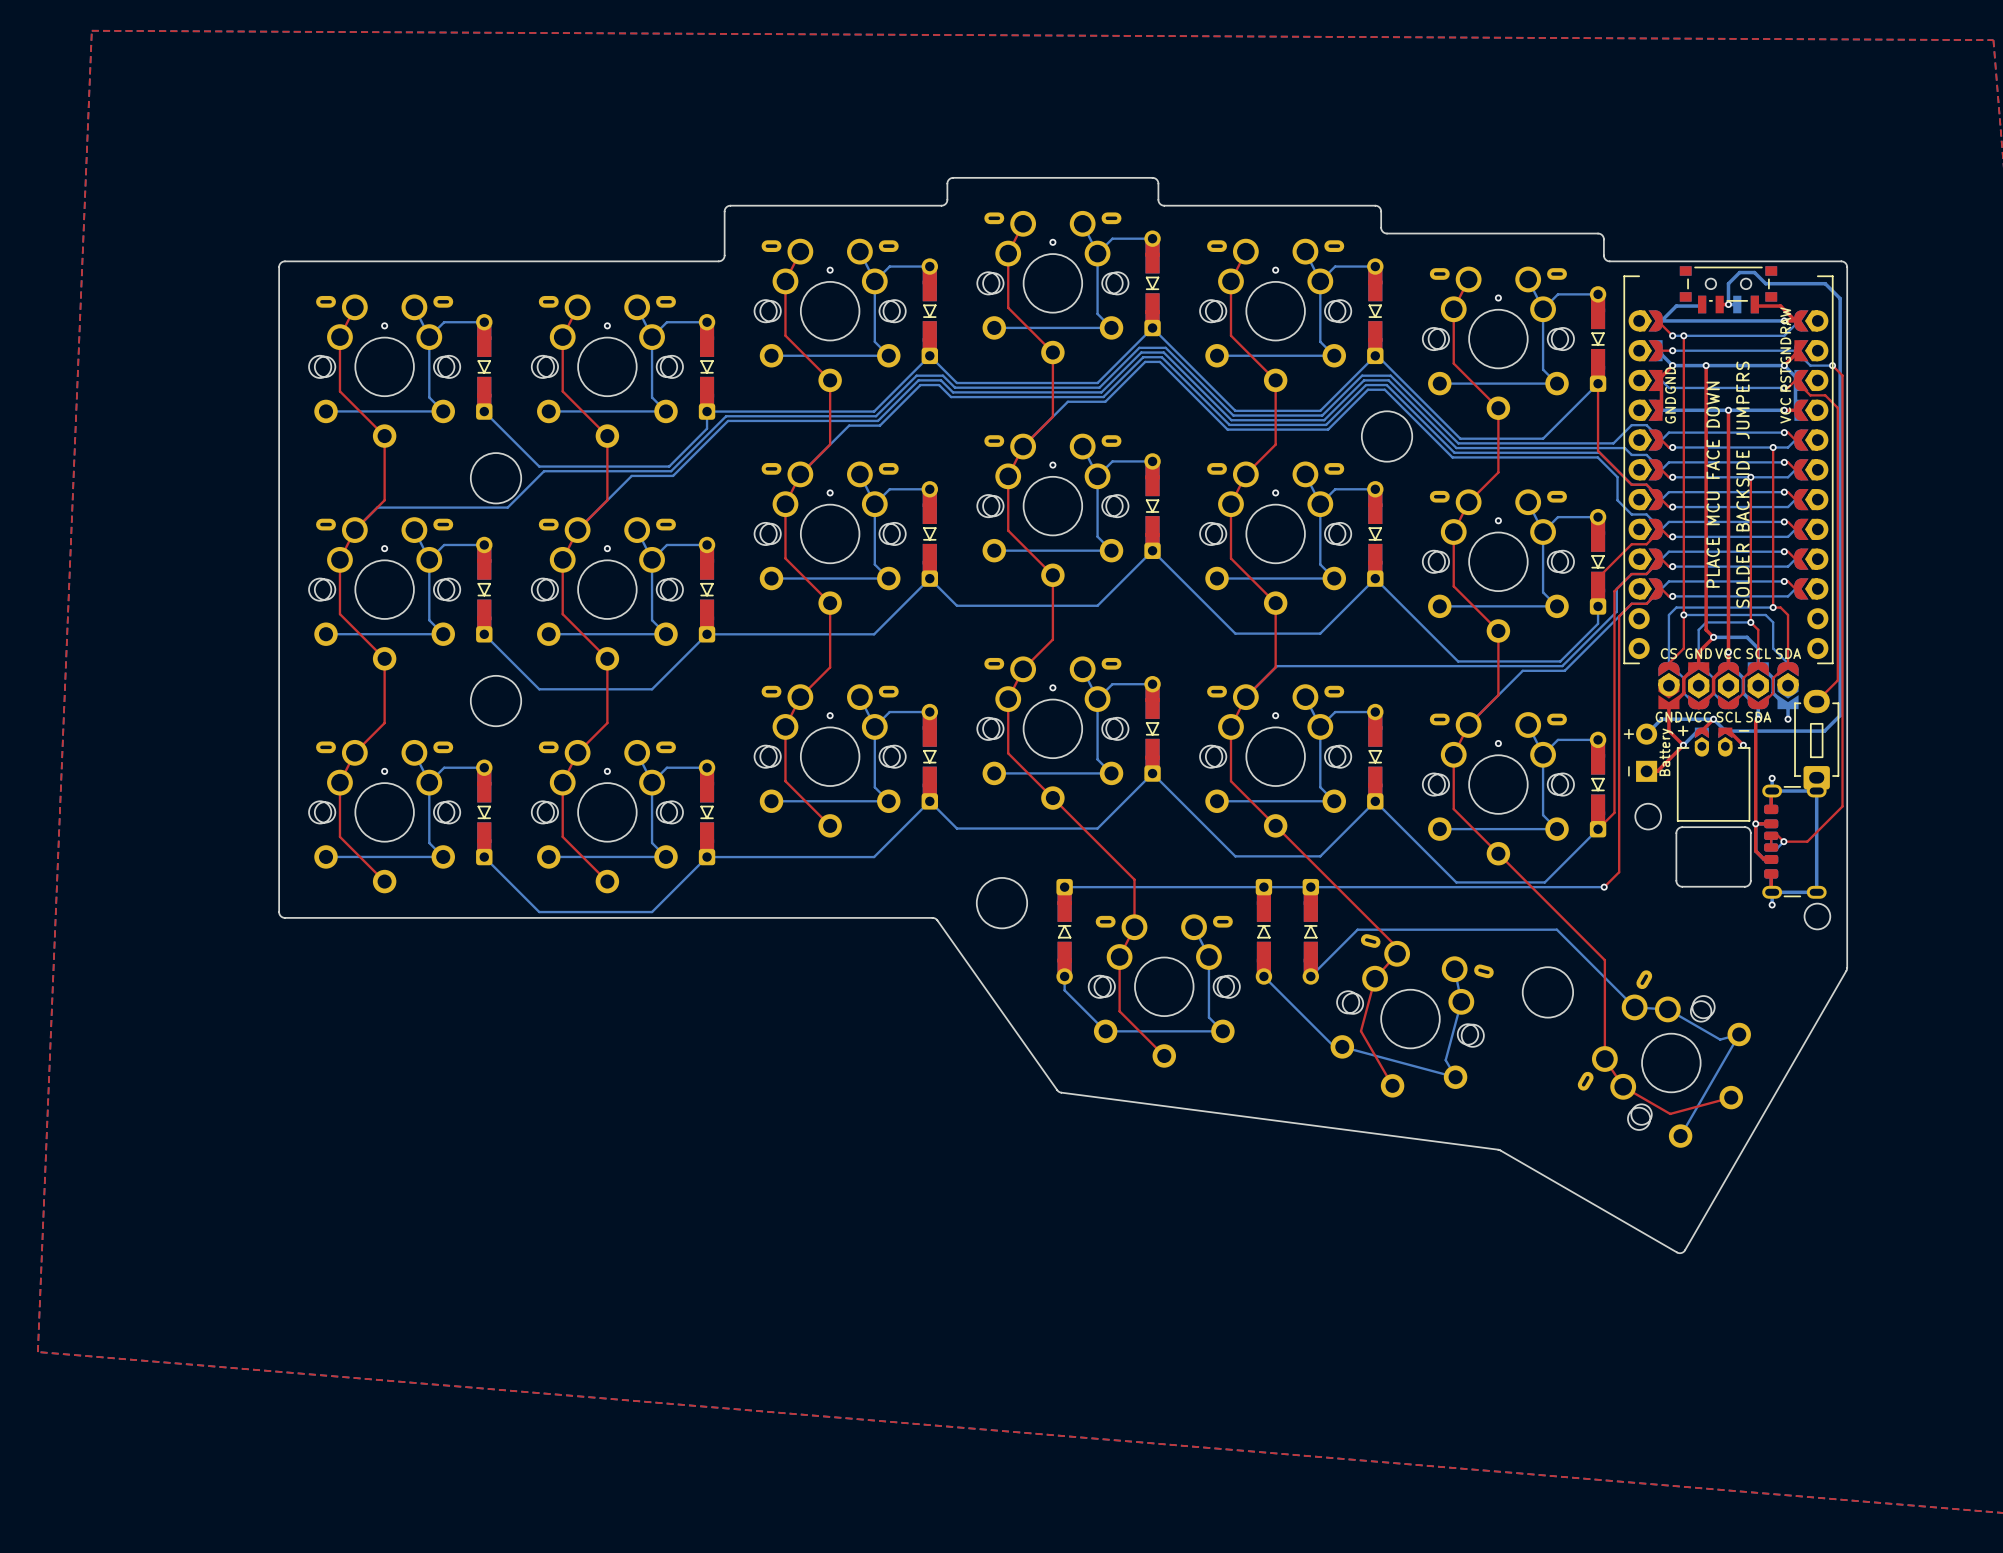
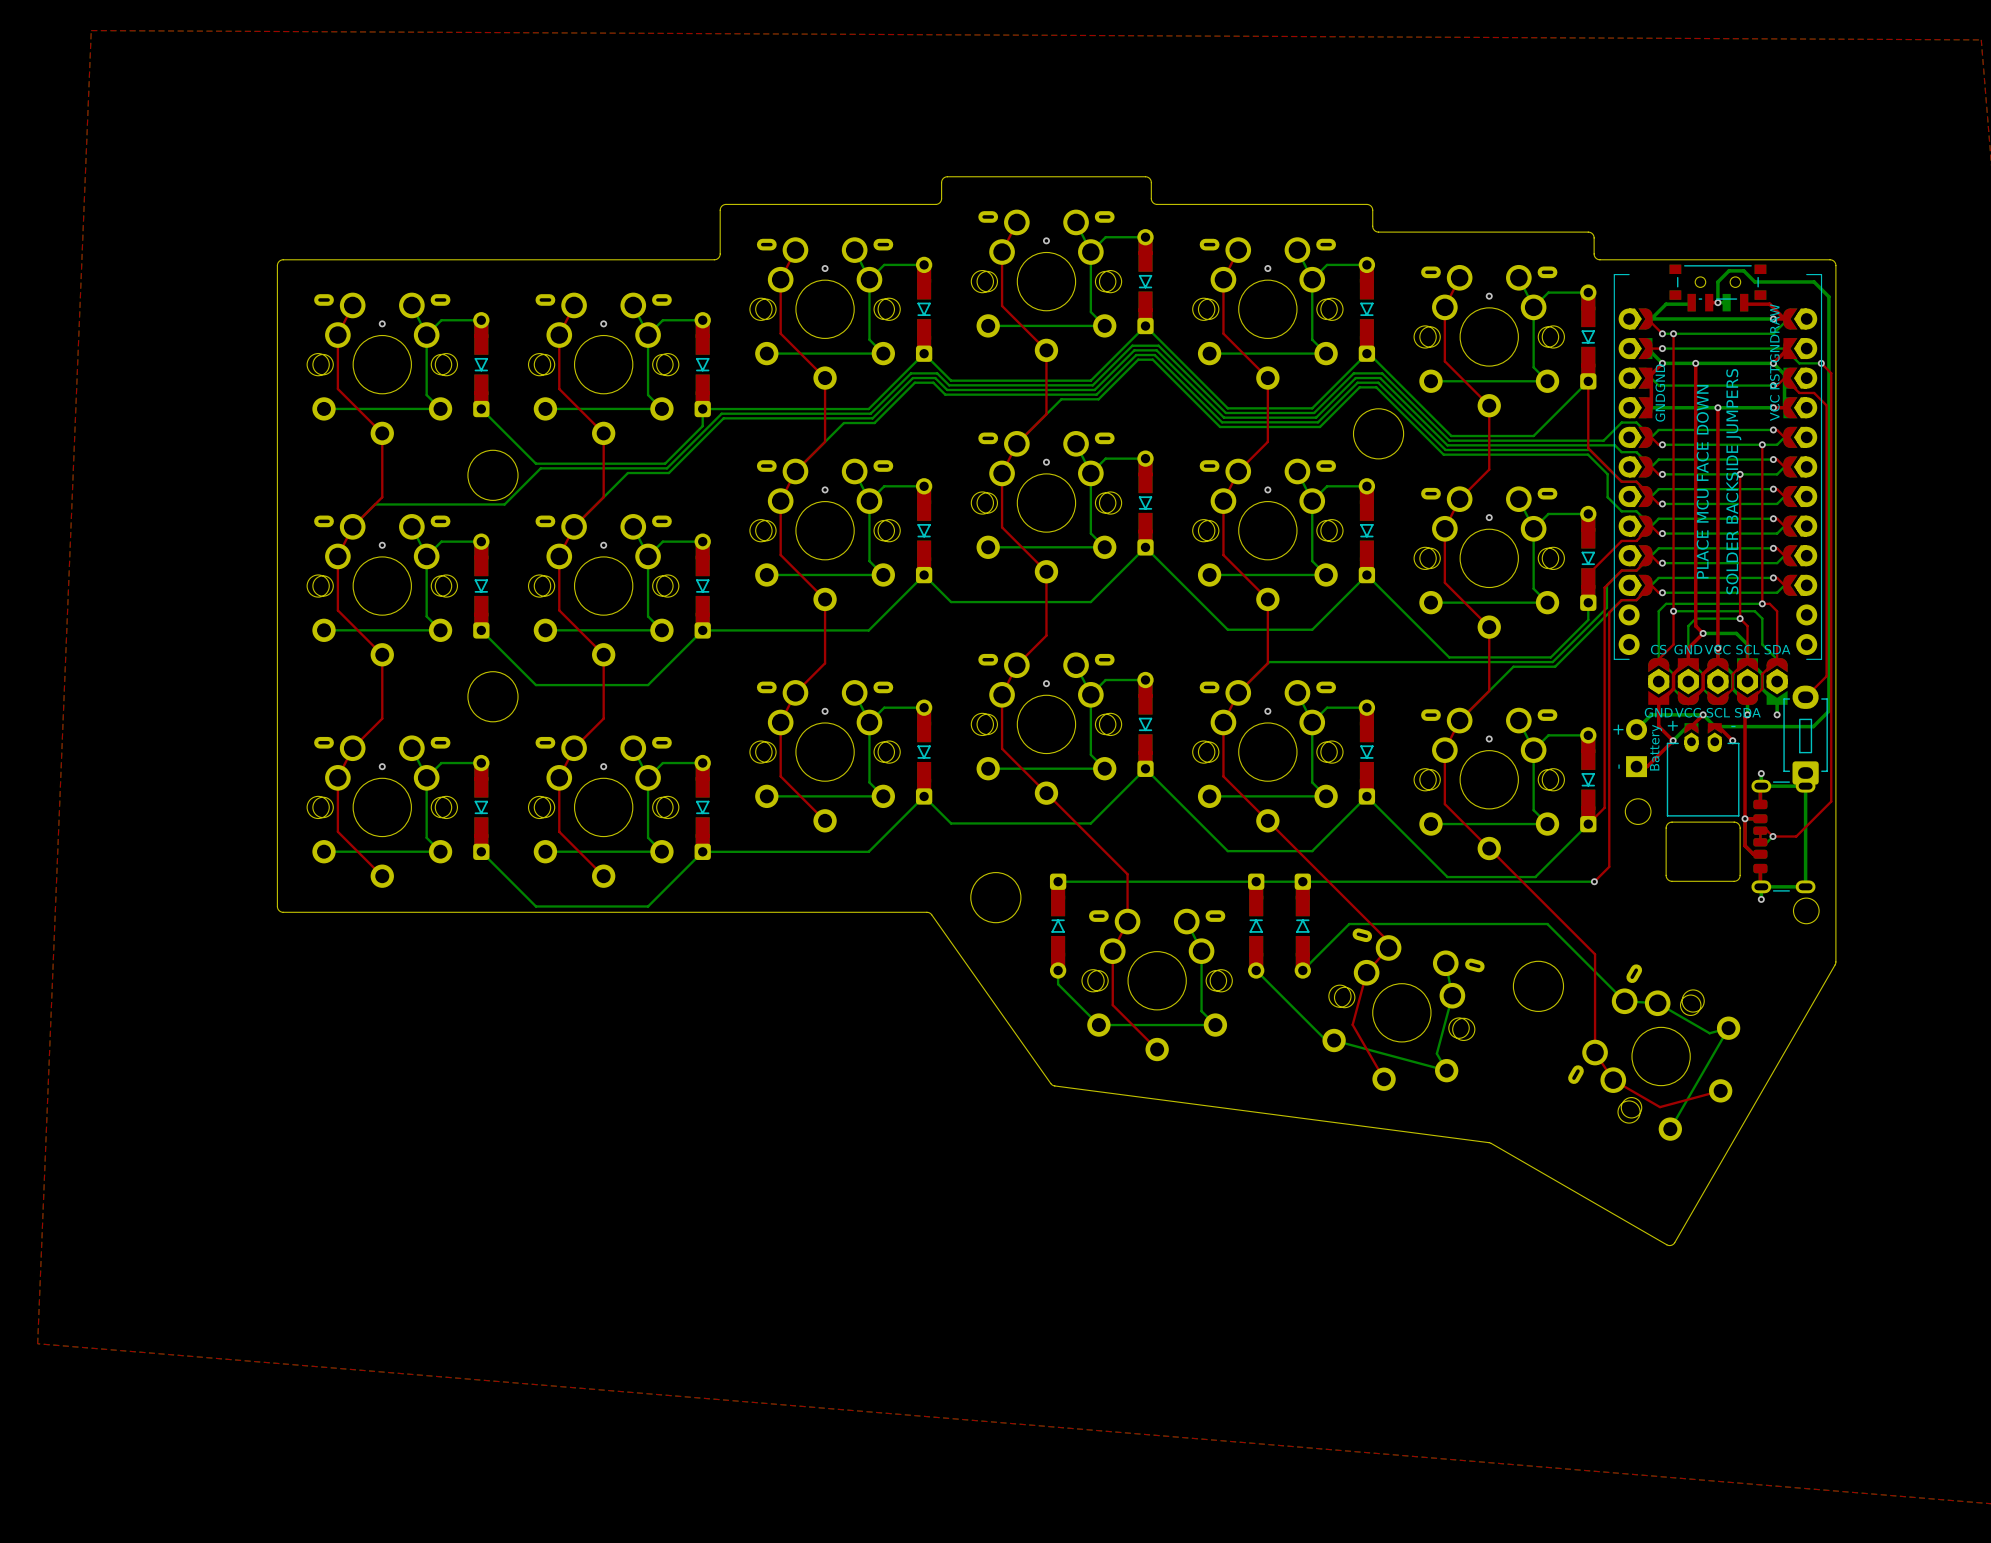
part footprint: [1658, 662, 1799, 710] -> [1648, 658, 1788, 705]

